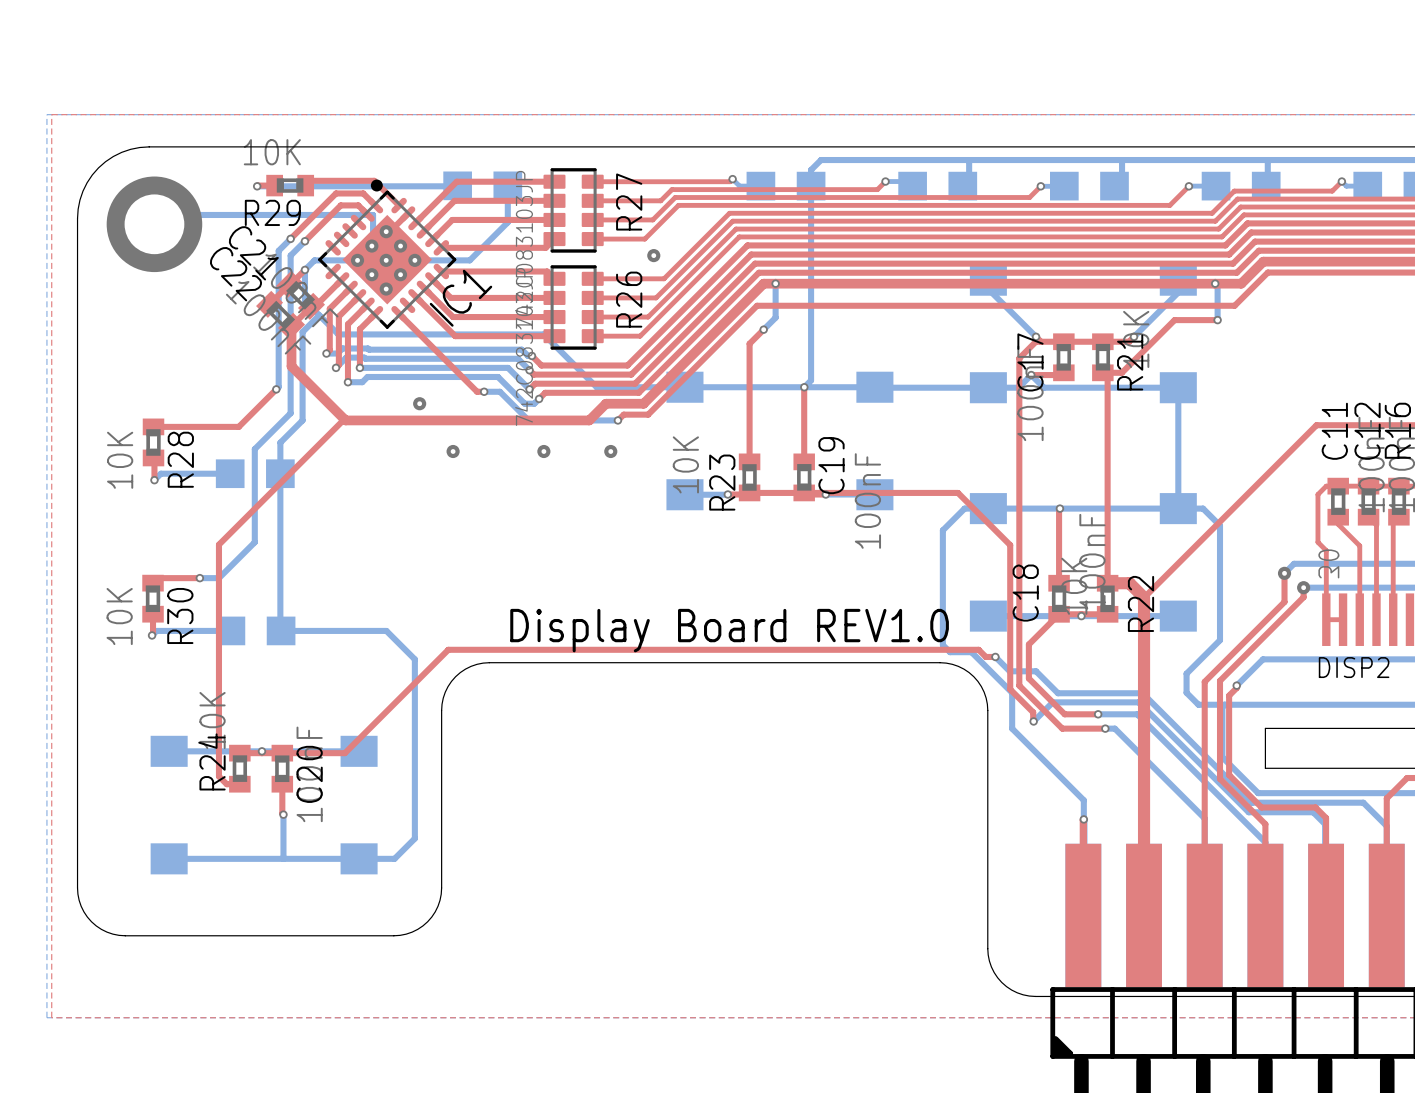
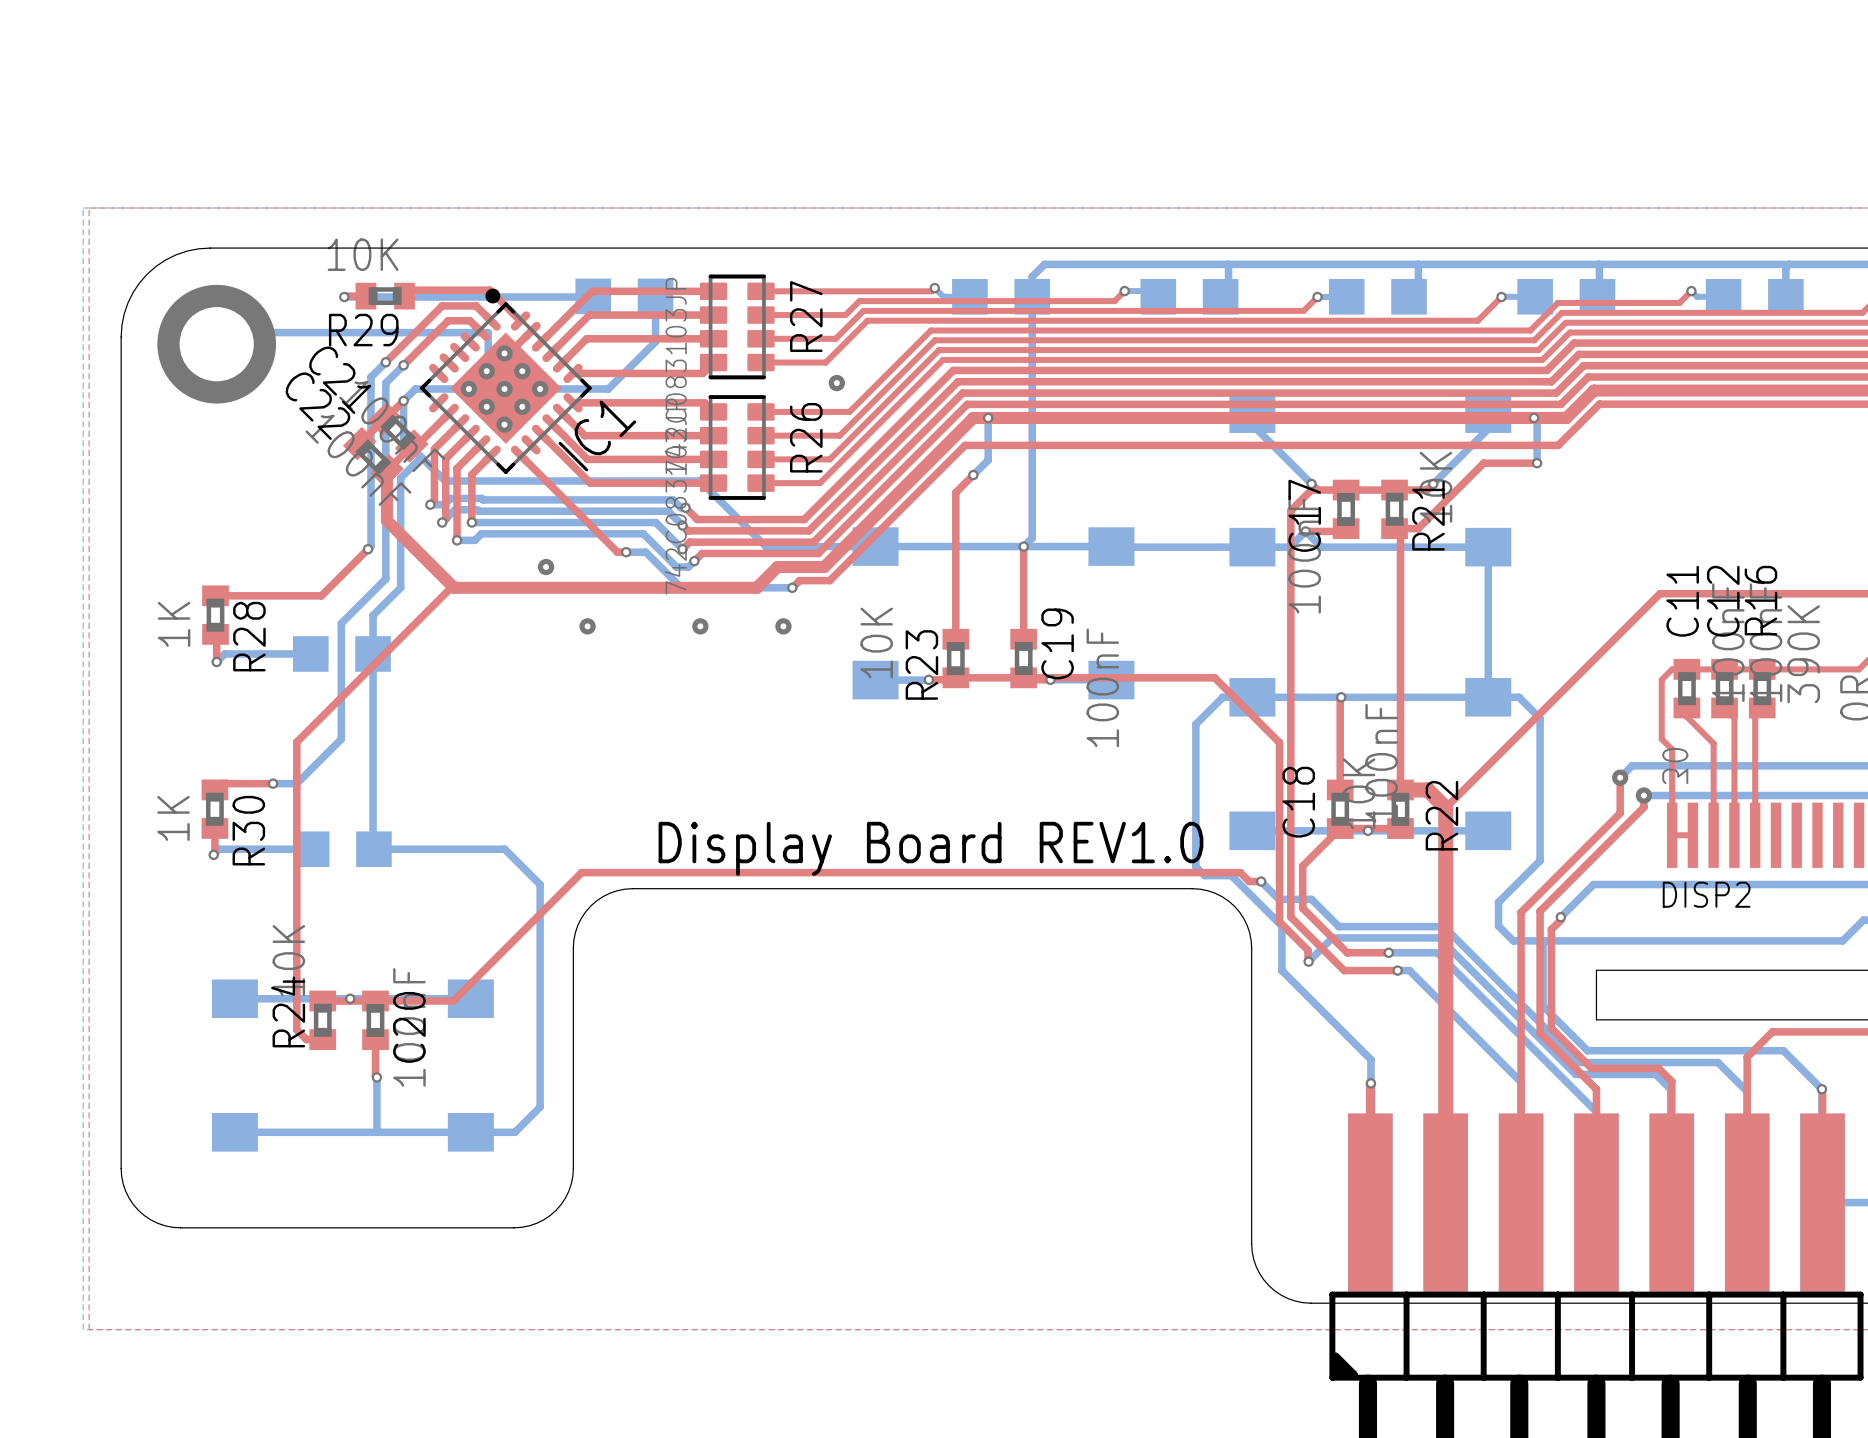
R28 value: 10K (120, 460) -> 1K (174, 624)
R30 value: 10K (119, 616) -> 1K (173, 818)

